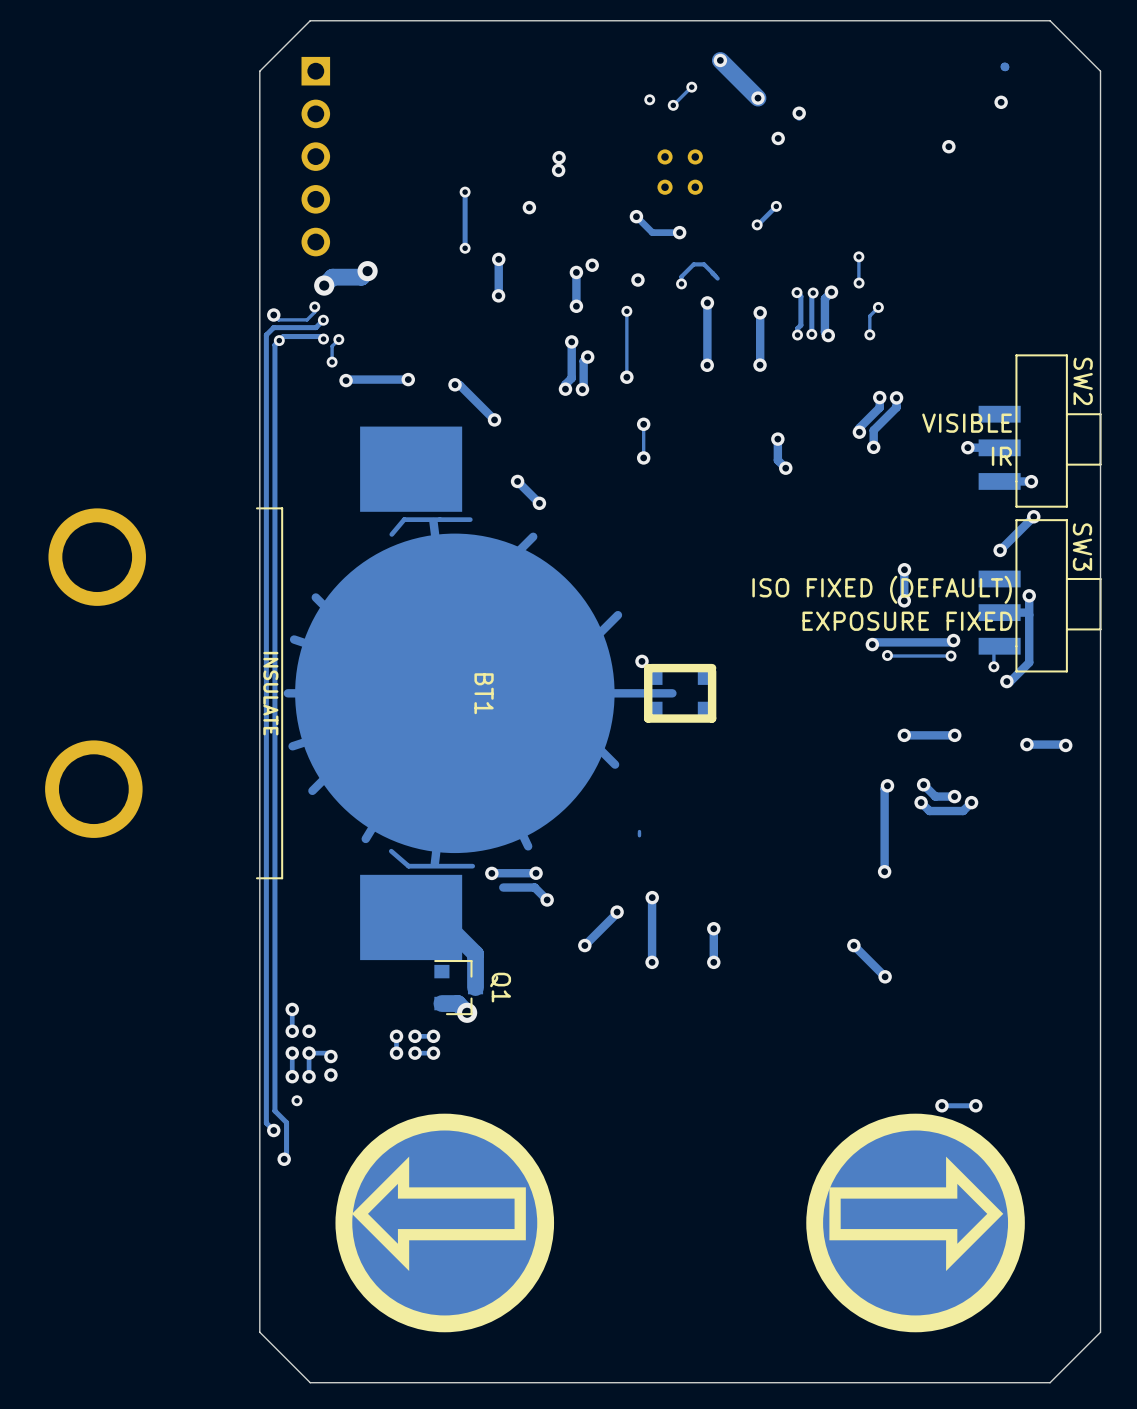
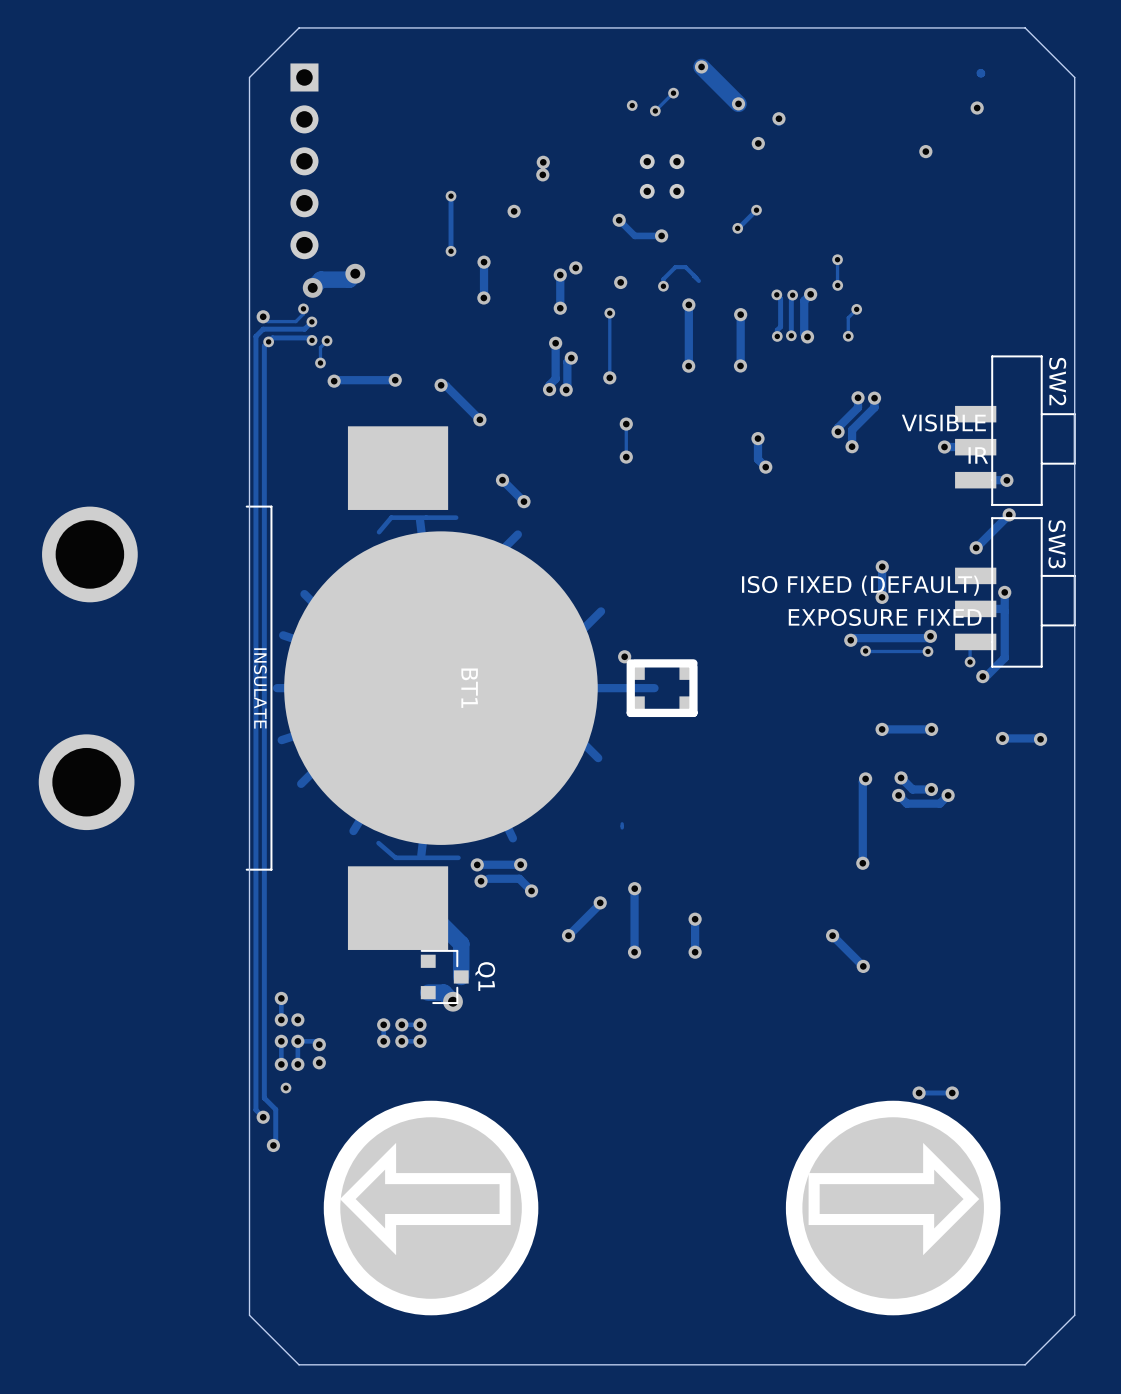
via: none -> (481, 881)

